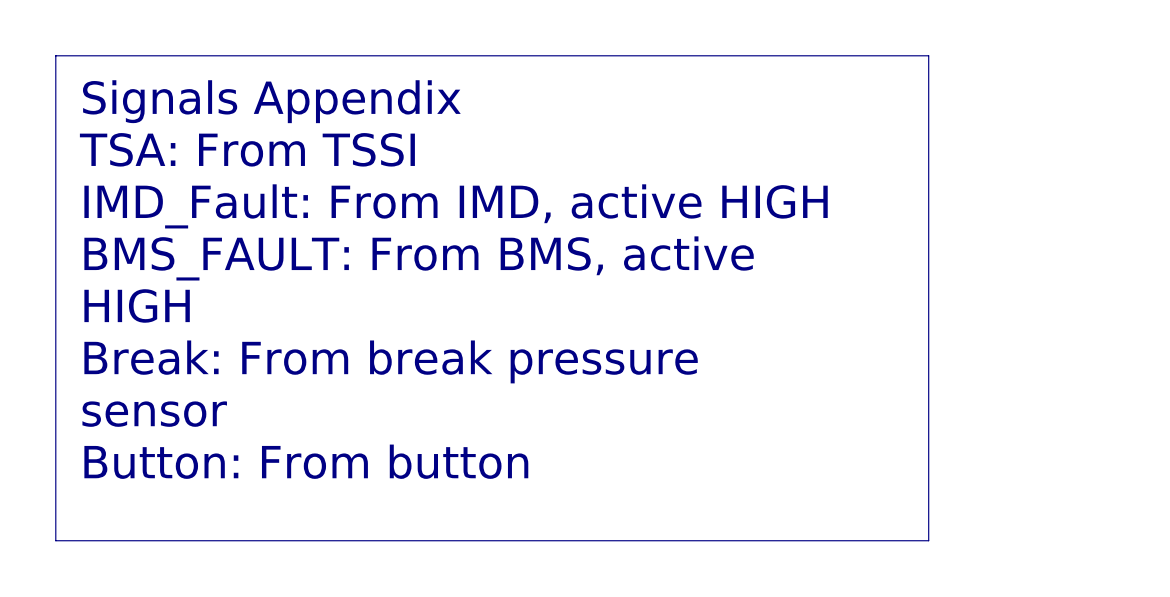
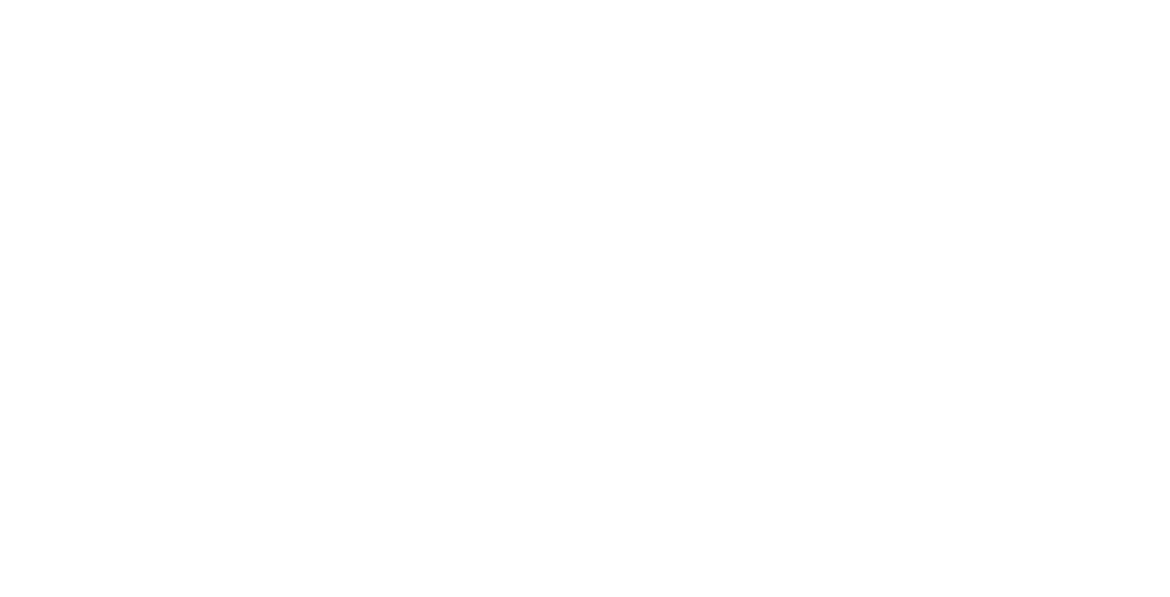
line: (55, 55) (928, 55) (928, 540) (55, 540) (55, 55) -> none
text: Signals Appendix (271, 101) -> none
text: TSA: From TSSI (247, 149) -> none
text: IMD_Fault: From IMD, active HIGH (456, 206) -> none
text: BMS_FAULT: From BMS, active (419, 258) -> none
text: HIGH (137, 305) -> none
text: Break: From break pressure (391, 361) -> none
text: sensor (154, 414) -> none
text: Button: From button (306, 461) -> none

